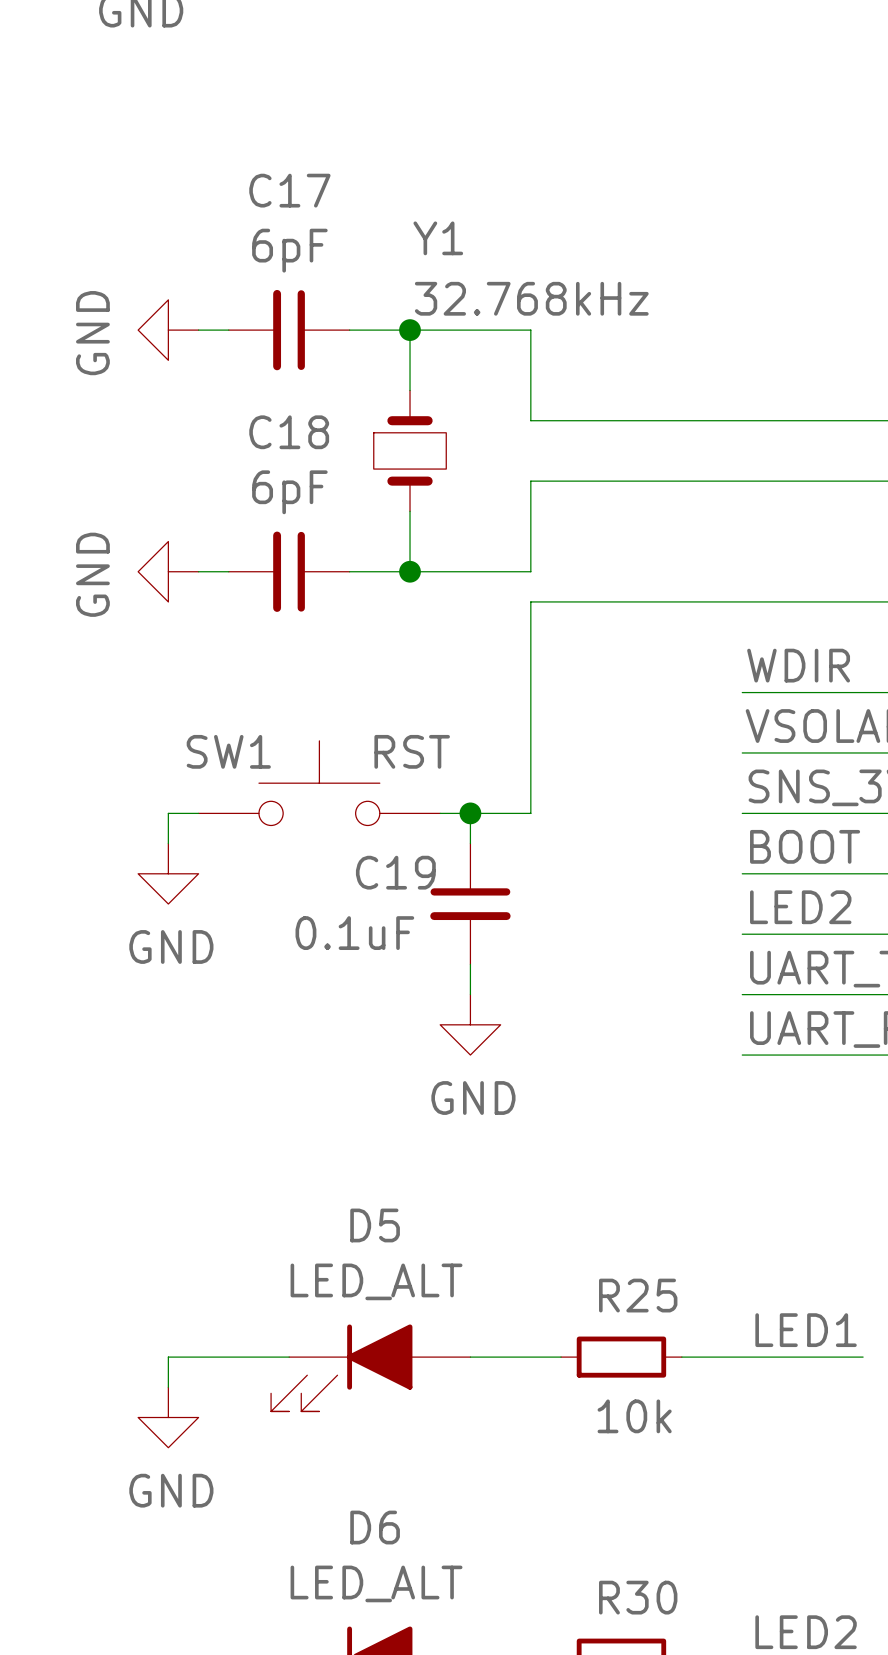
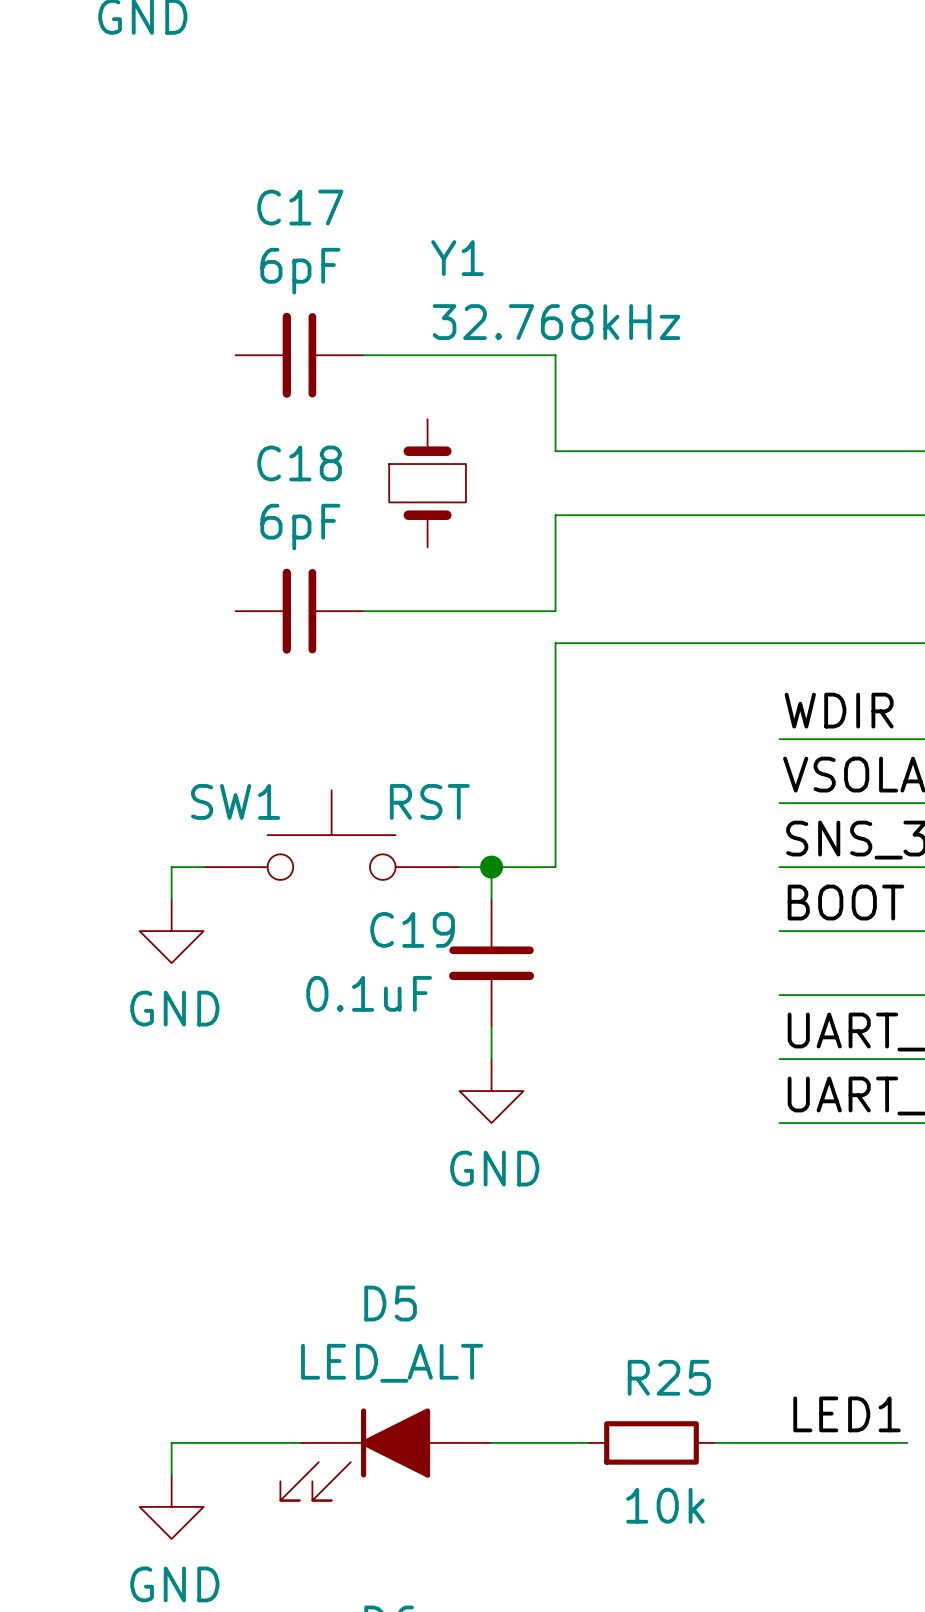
power symbol: GND (168, 330) -> none
wire: (198, 330) (228, 330) -> none
wire: (410, 330) (410, 390) -> none
junction: (410, 330) -> none
wire: (410, 511) (410, 571) -> none
power symbol: GND (168, 571) -> none
wire: (198, 571) (228, 571) -> none
junction: (410, 571) -> none
label: LED2 (800, 907) -> none

